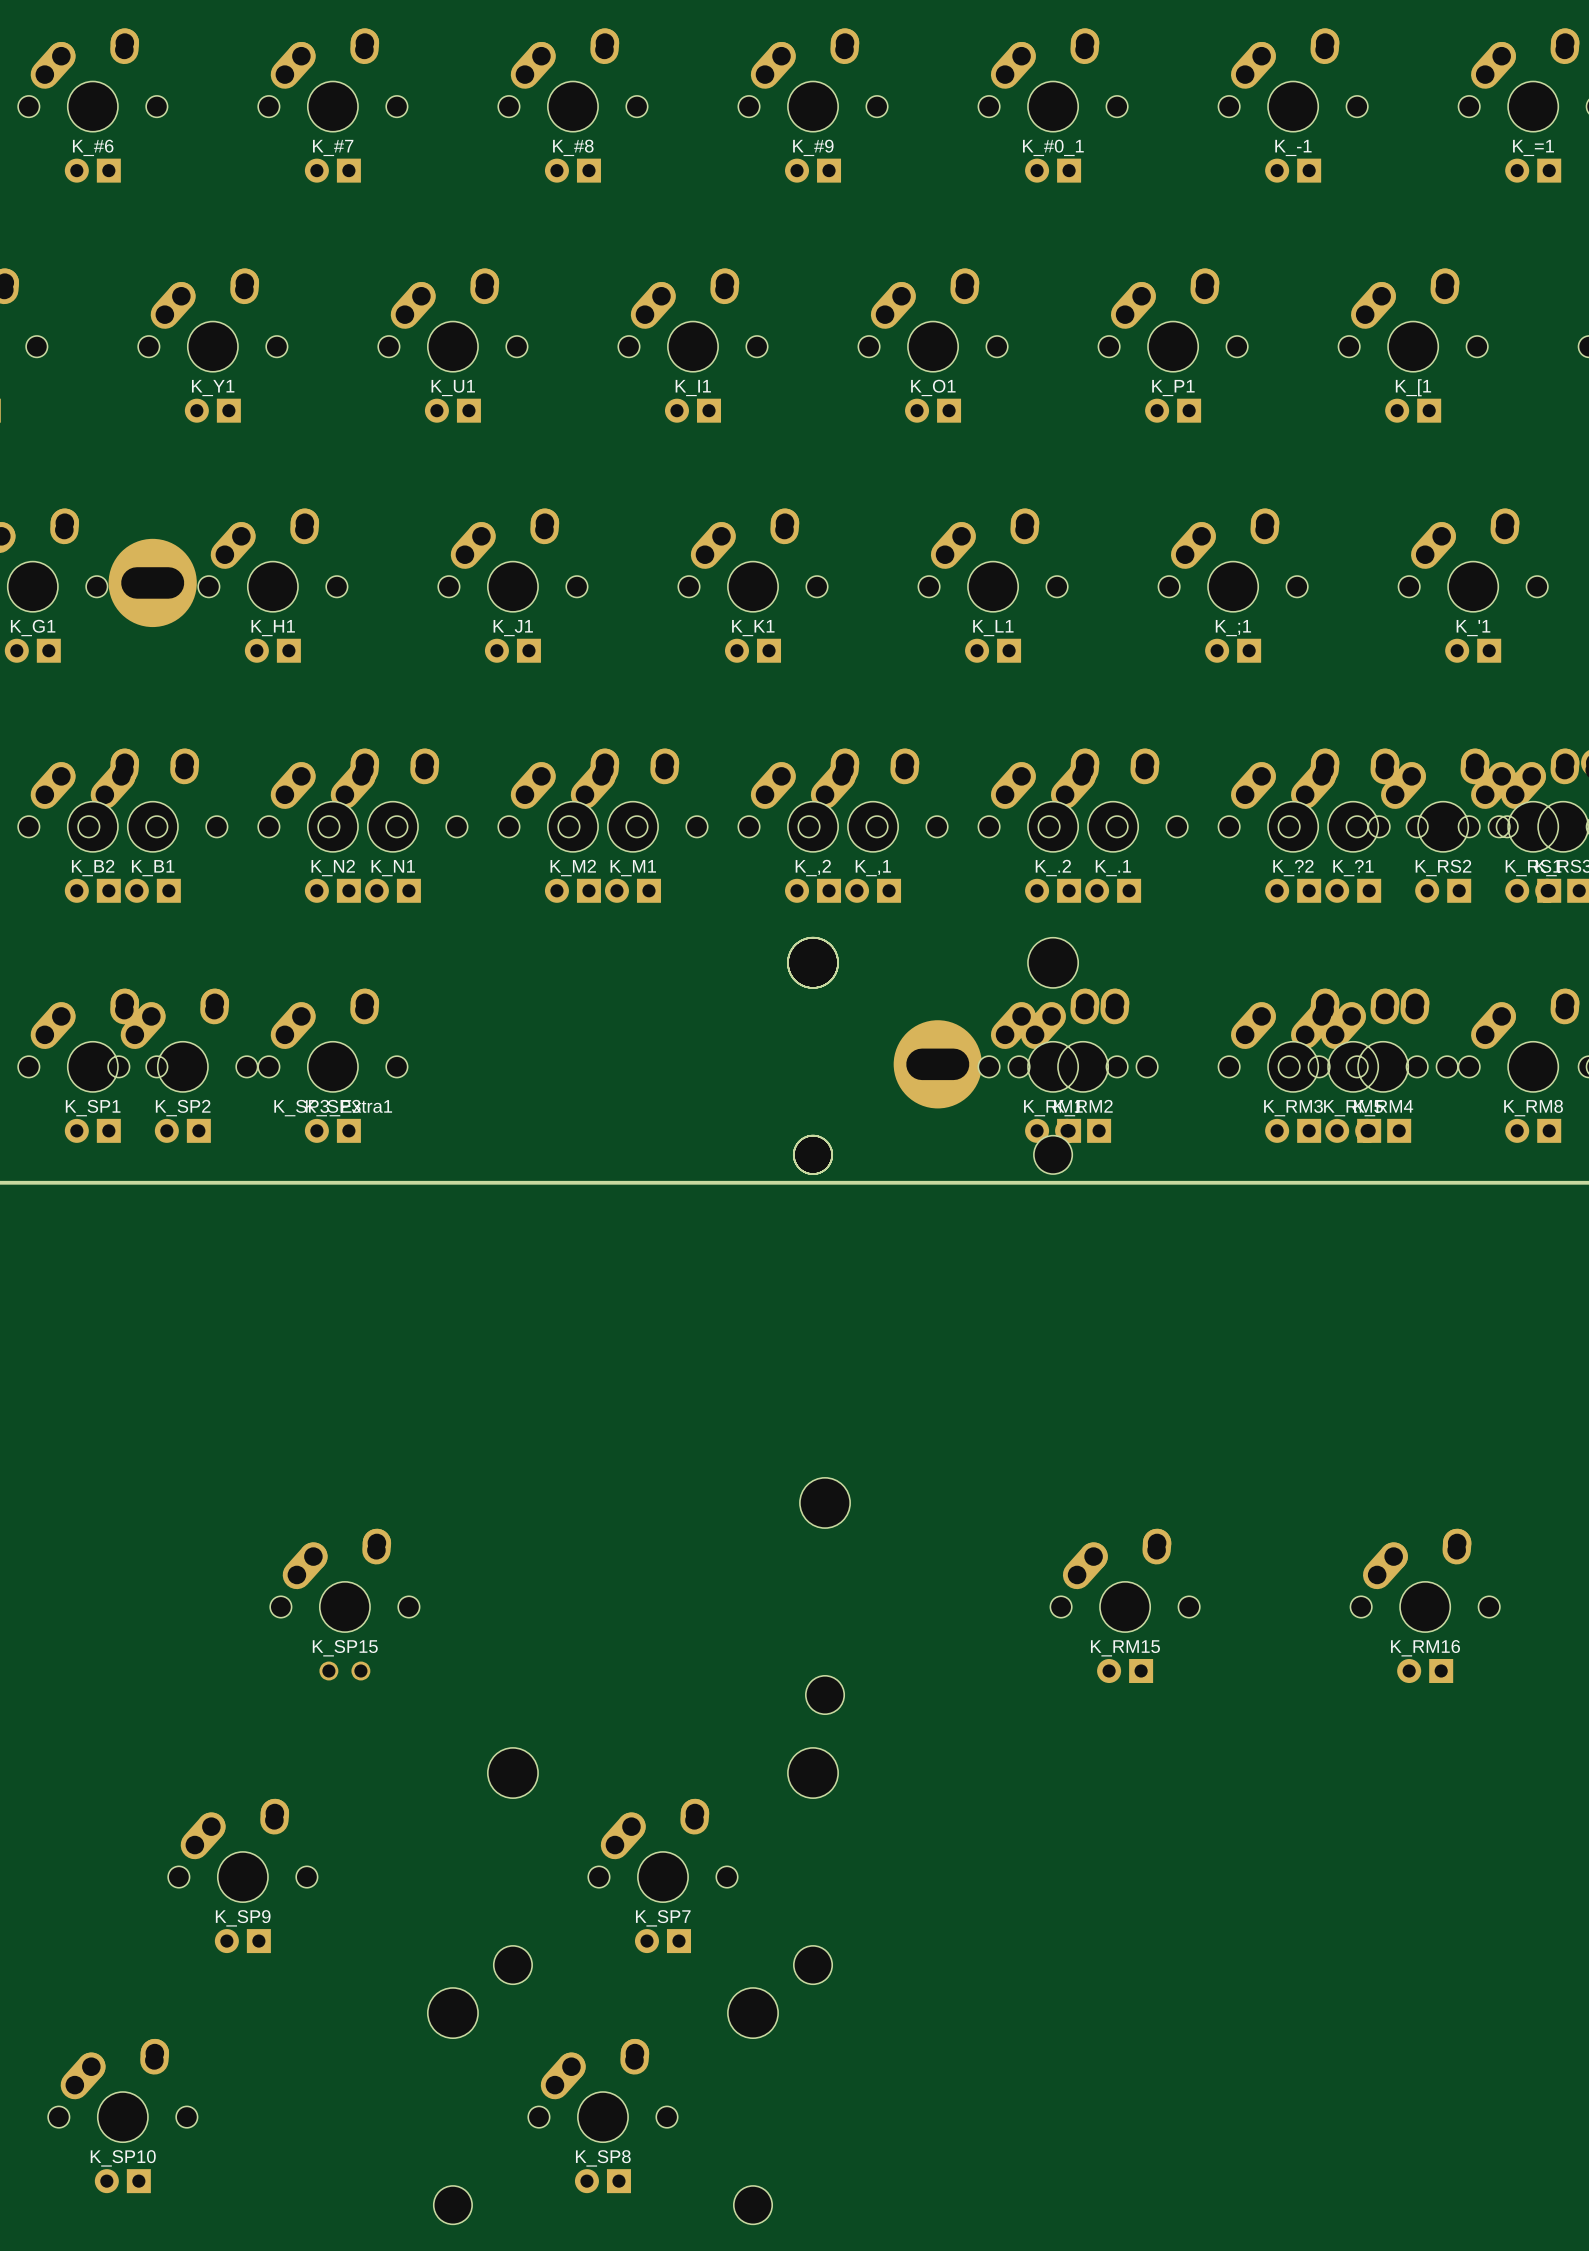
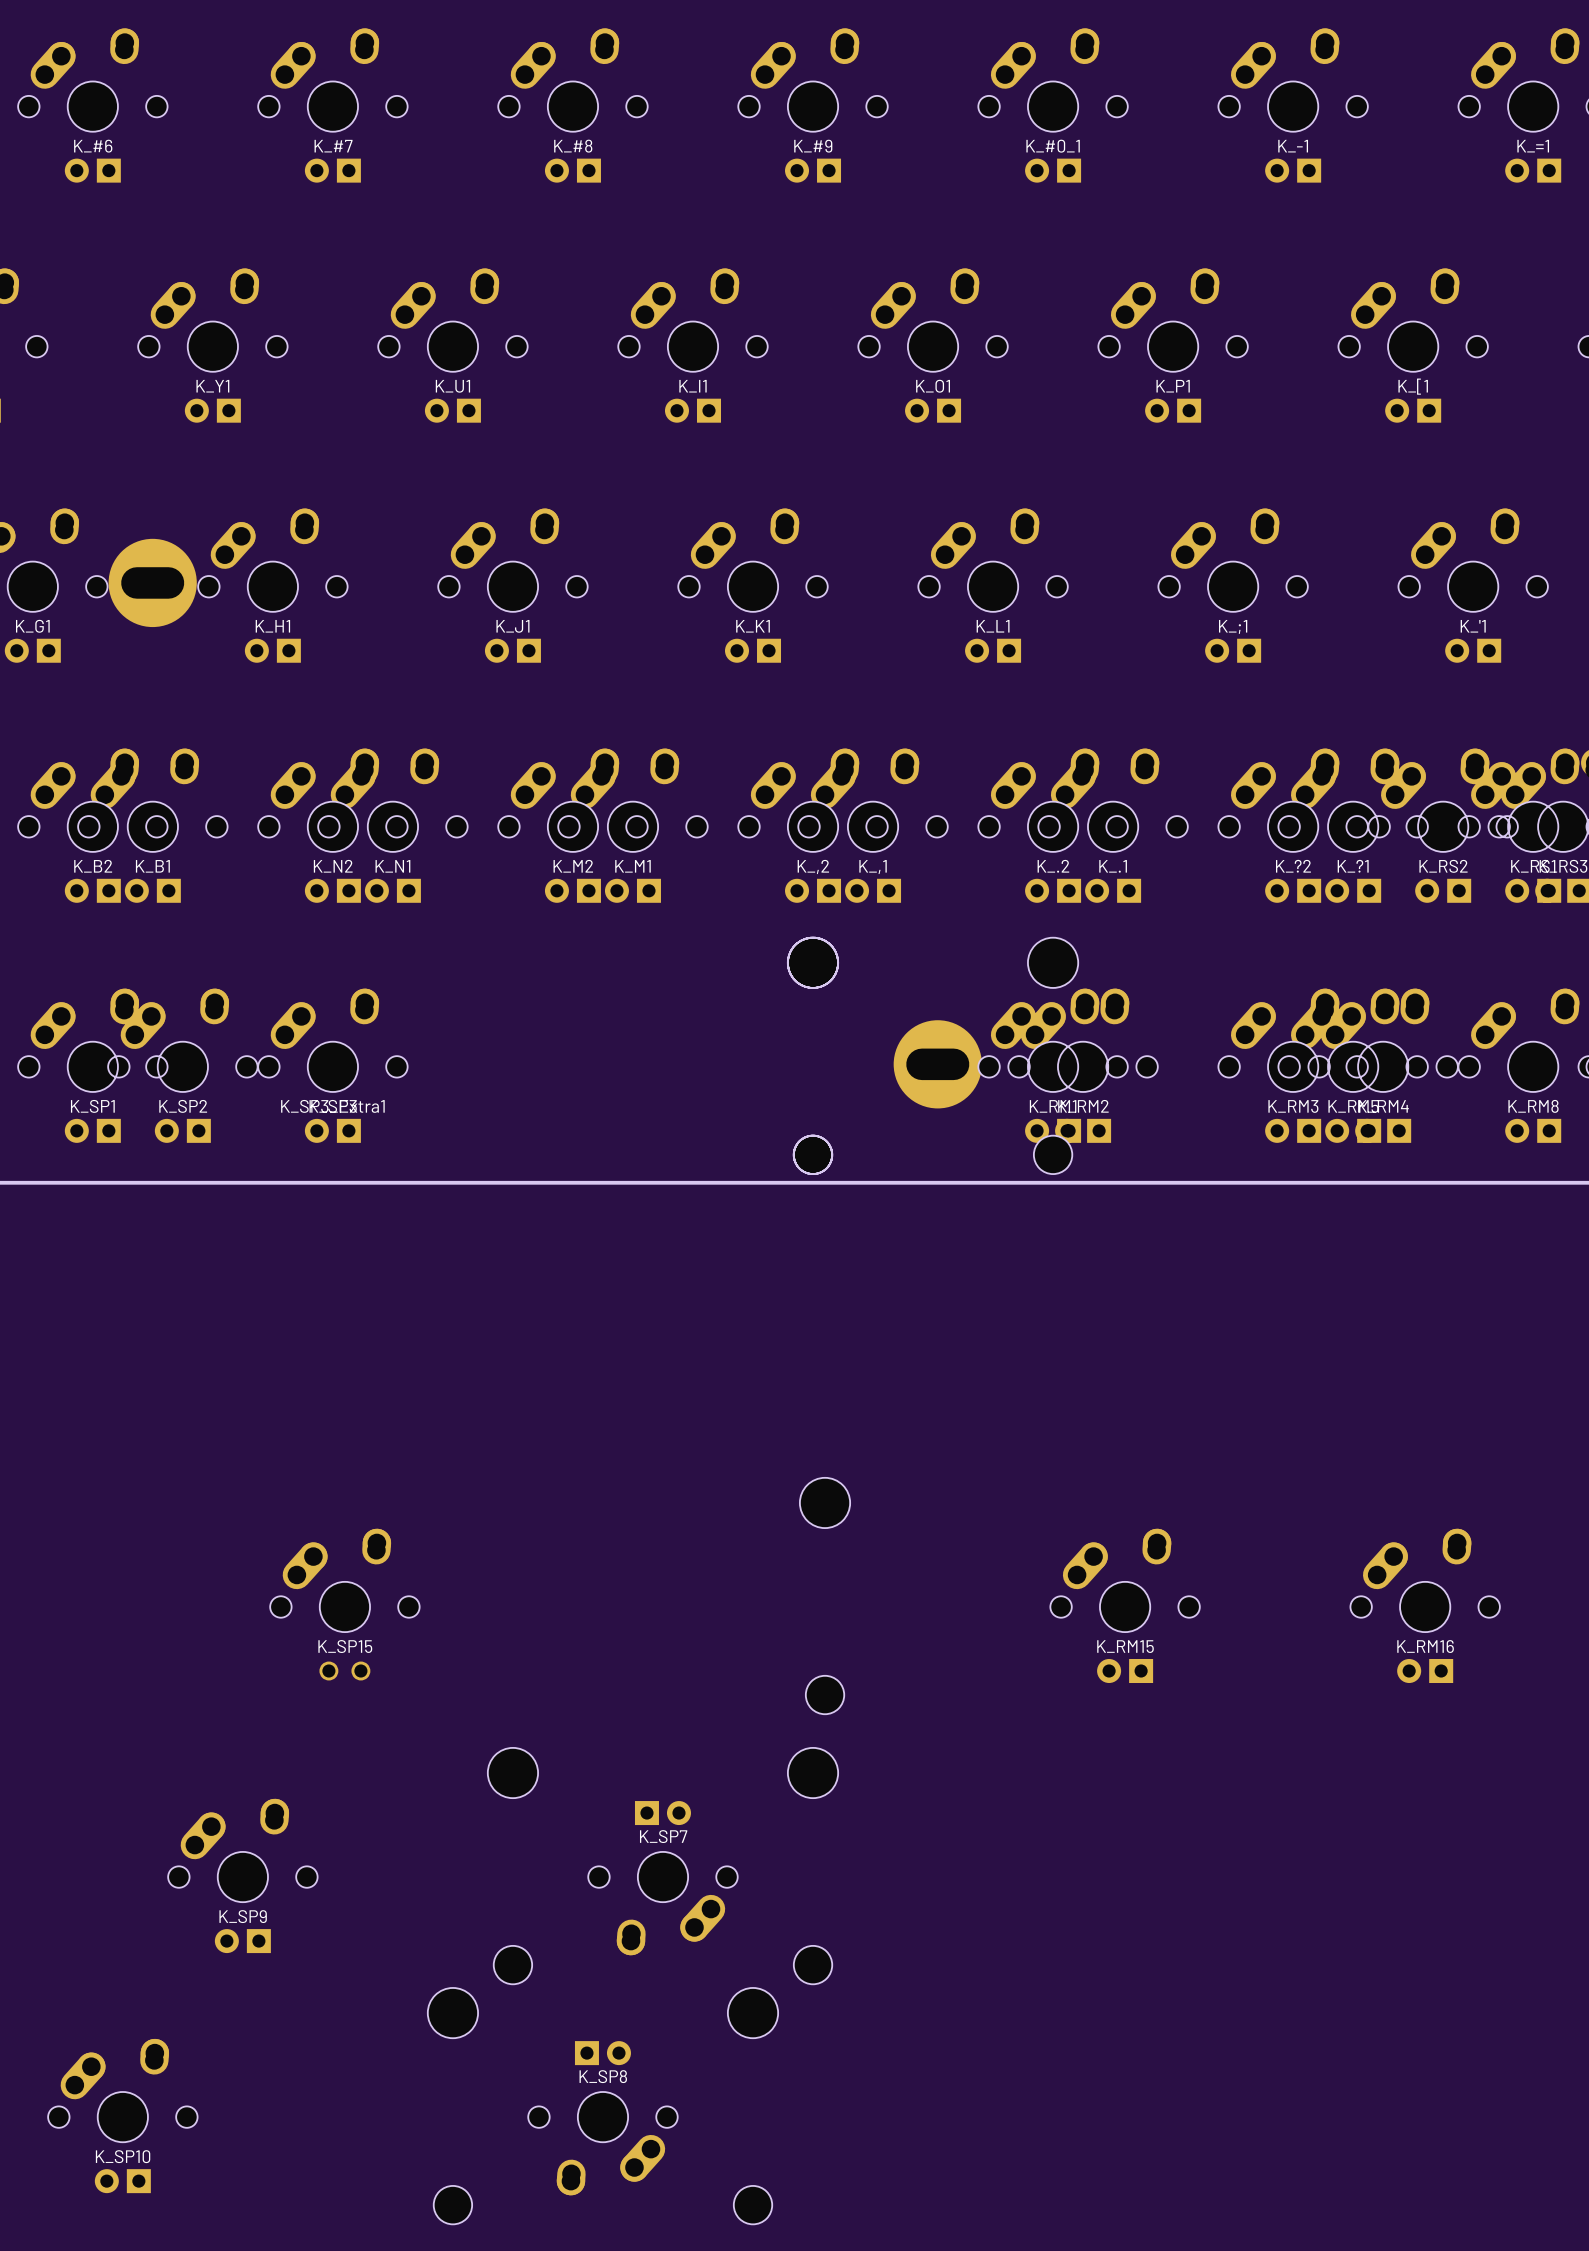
K_SP7 footprint: [487, 1747, 839, 1985] -> [487, 1747, 839, 1985]
K_SP7 name position: K_SP7 (663, 1918) -> K_SP7 (663, 1836)
K_SP8 footprint: [427, 1987, 779, 2225] -> [427, 1987, 779, 2225]
K_SP8 name position: K_SP8 (603, 2158) -> K_SP8 (603, 2076)

